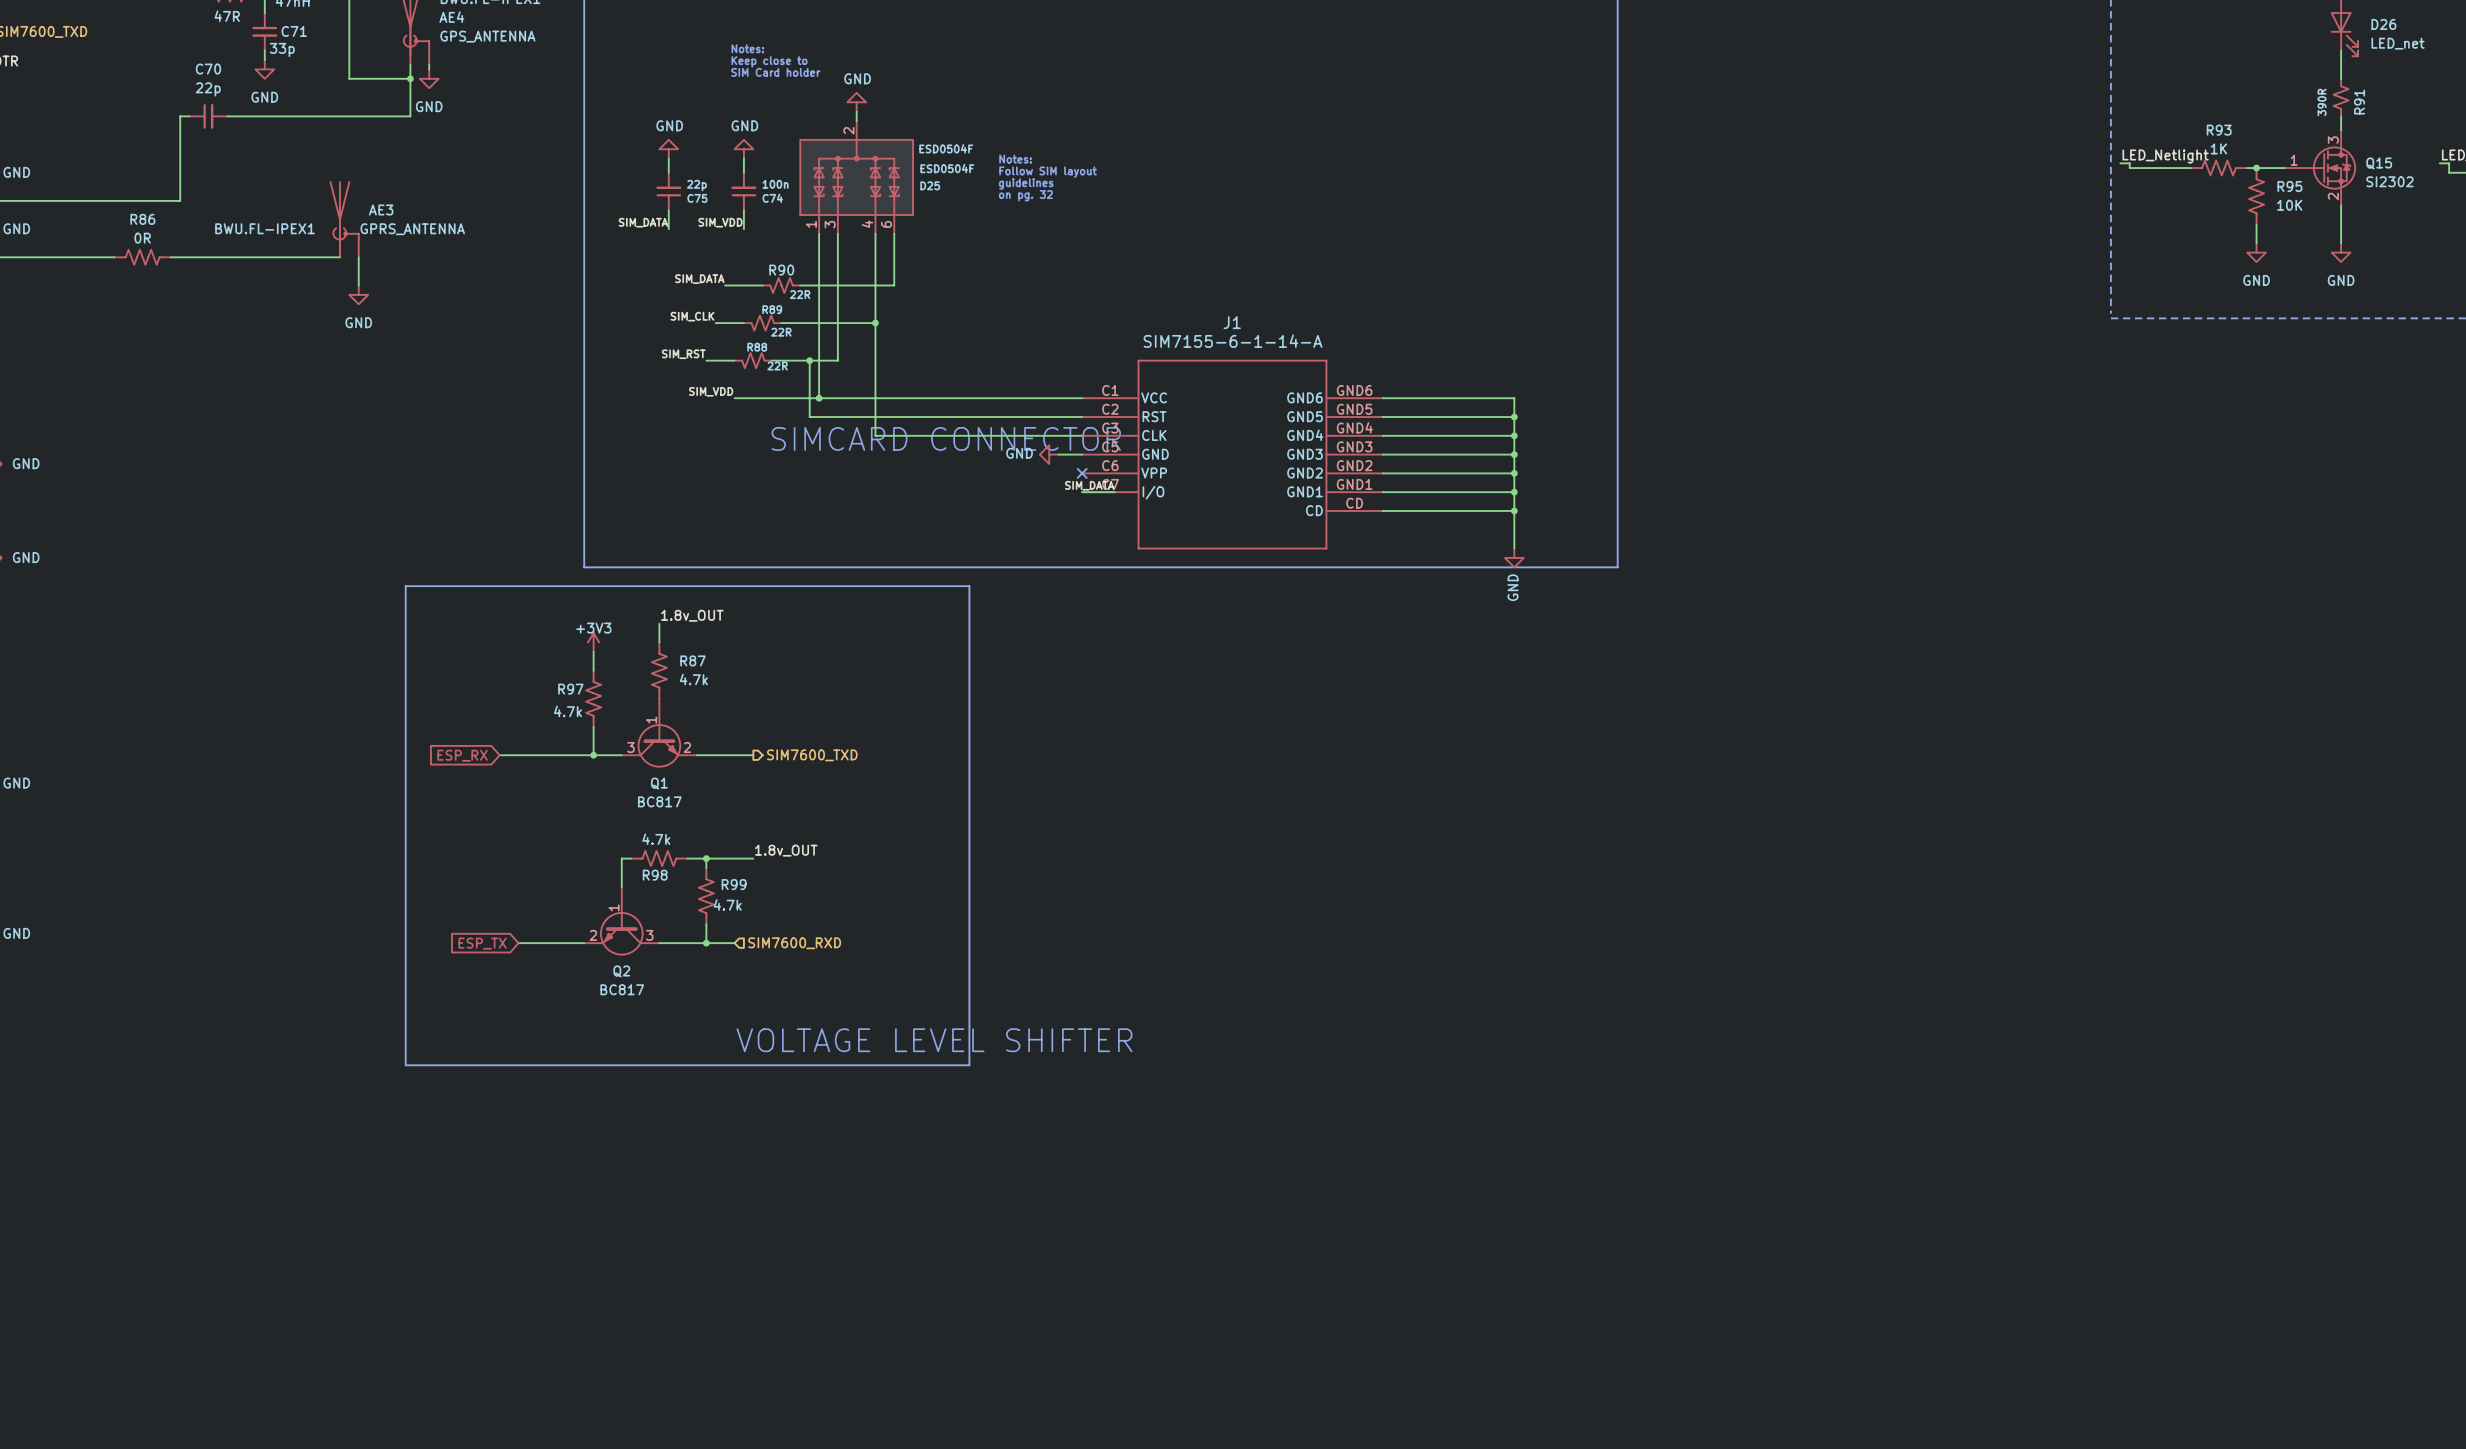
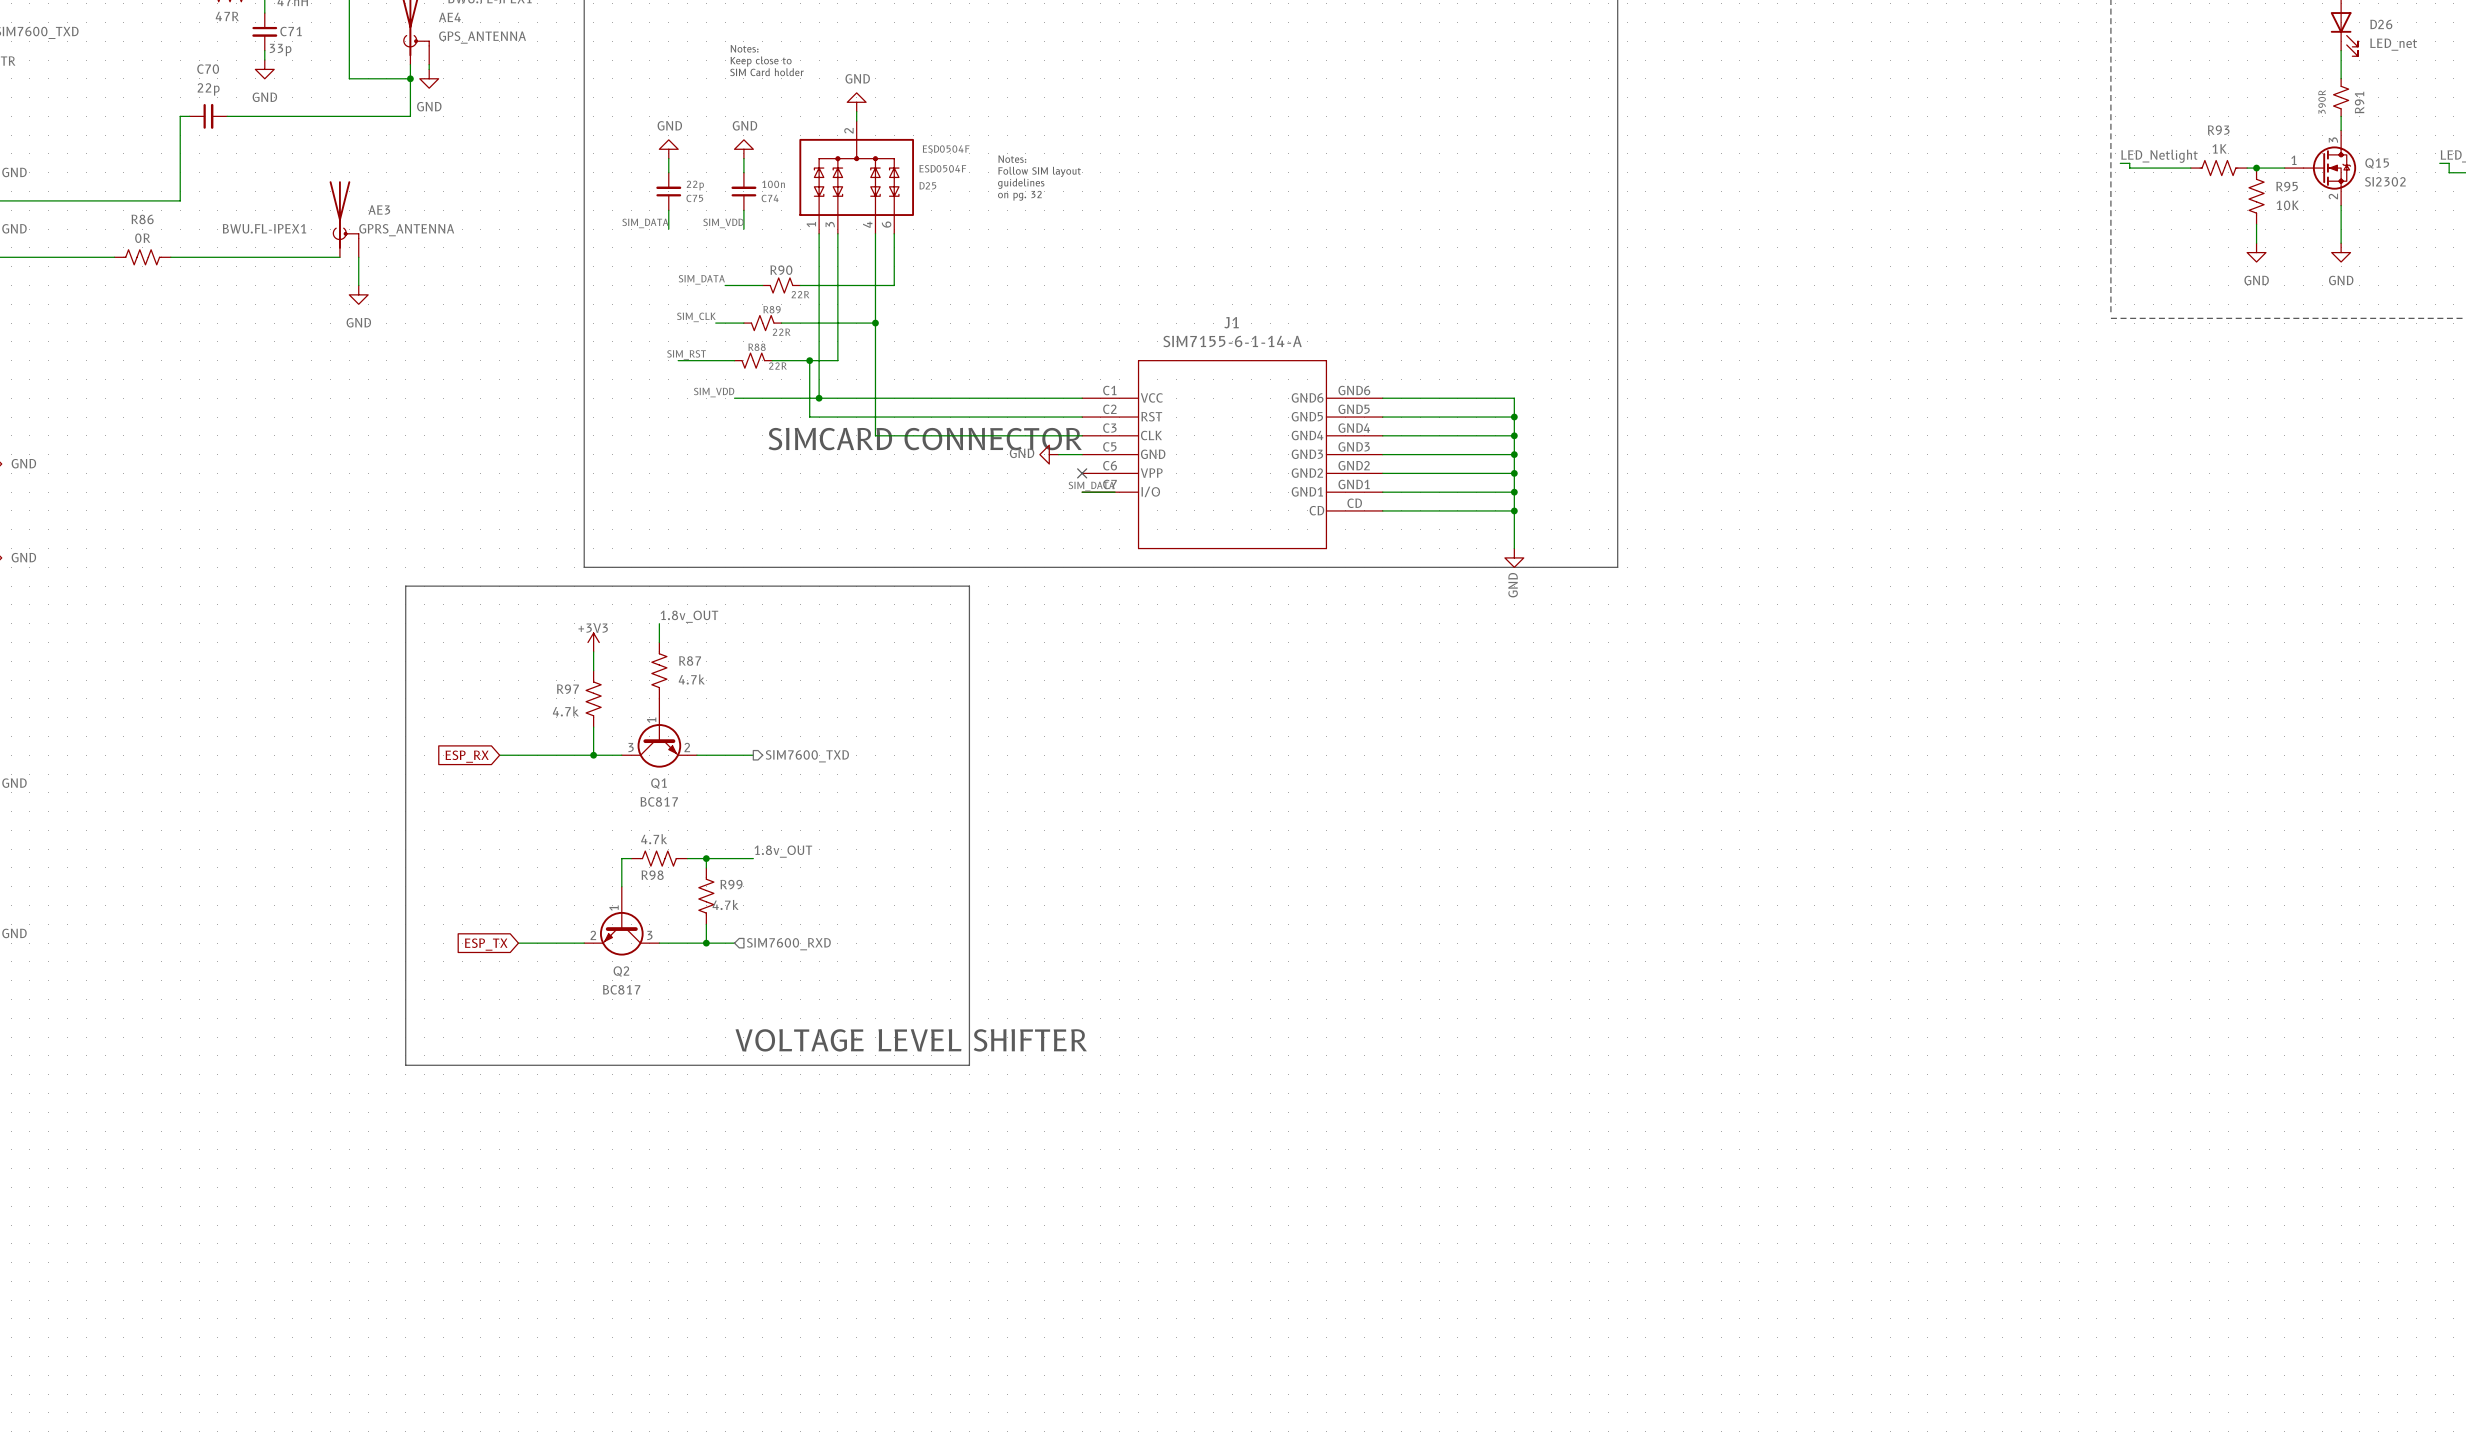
wire: none -> (678, 360) (706, 360)

